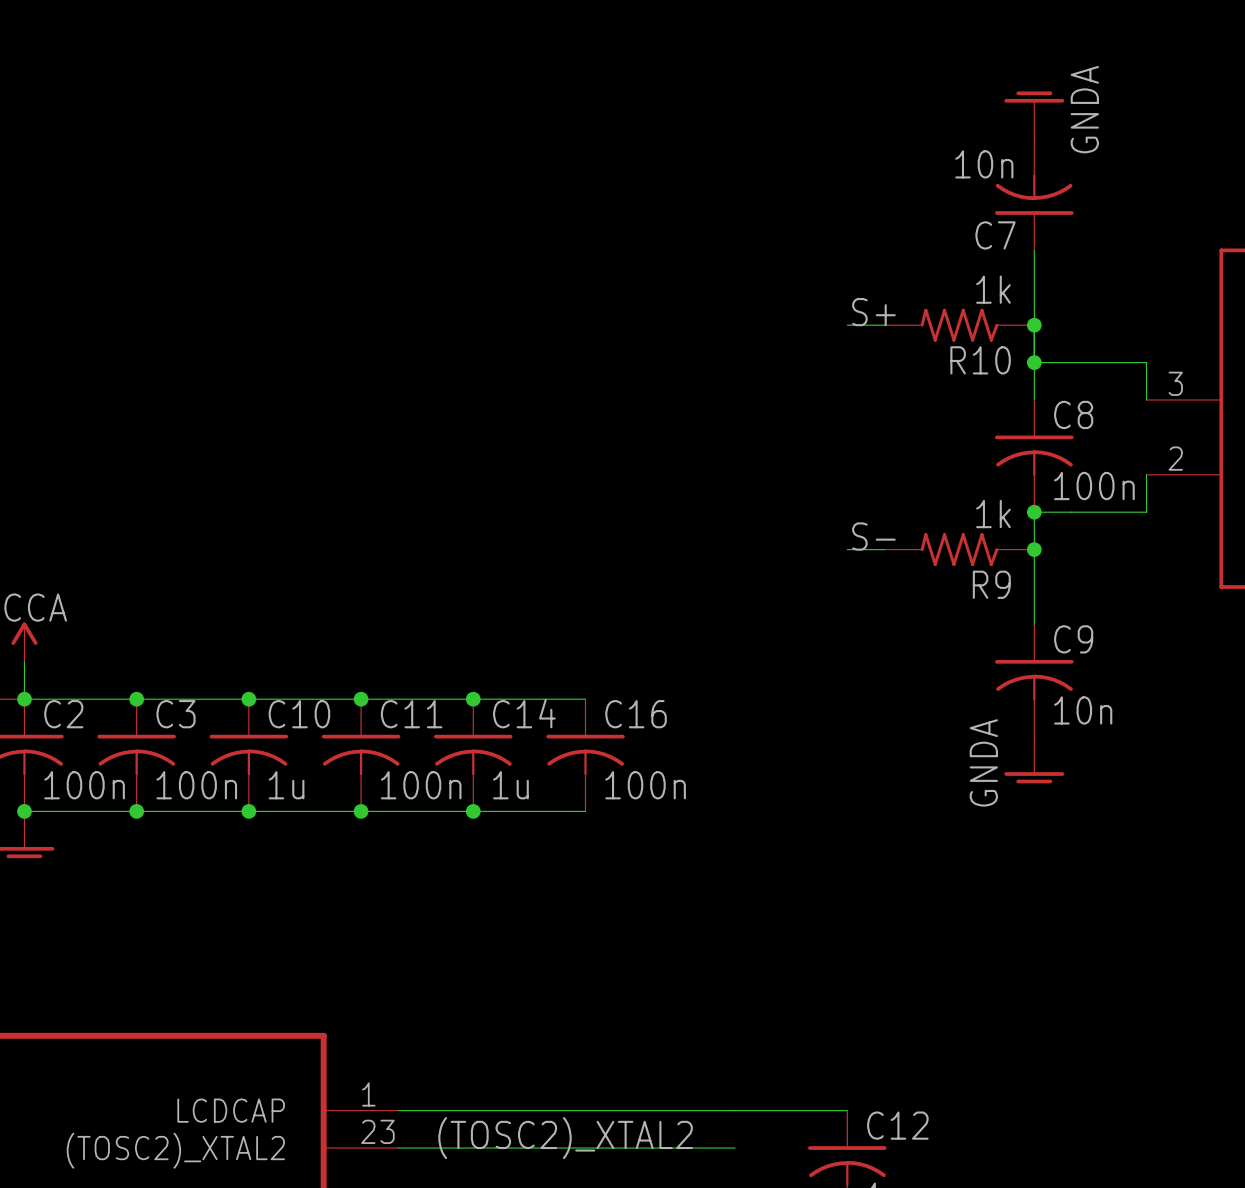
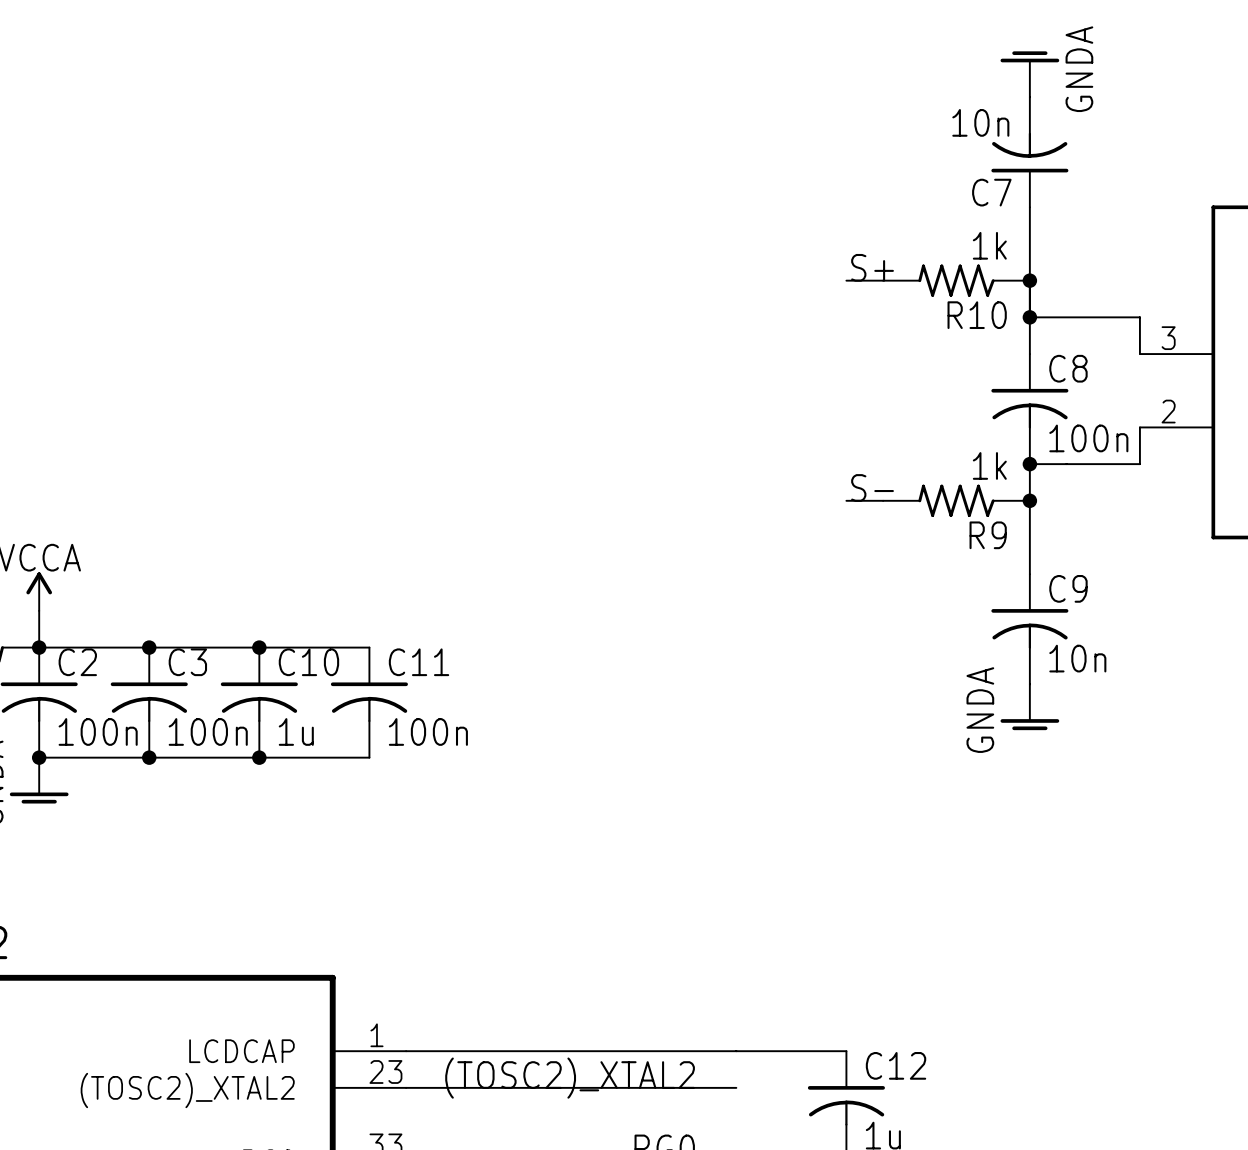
wire: (361, 699) (585, 699) -> none
junction: (361, 699) -> none
junction: (473, 699) -> none
C14: 1u (473, 755) -> none
C16: 100n (585, 755) -> none
wire: (361, 811) (585, 811) -> none
junction: (361, 811) -> none
junction: (473, 811) -> none

